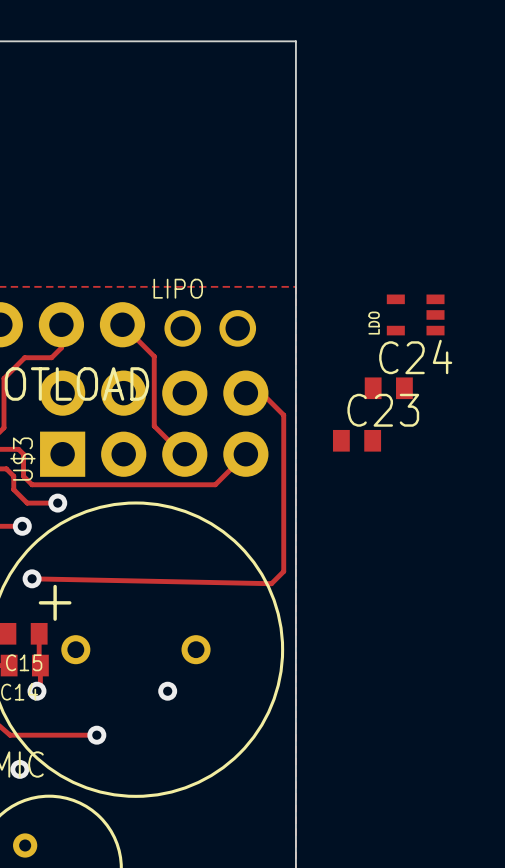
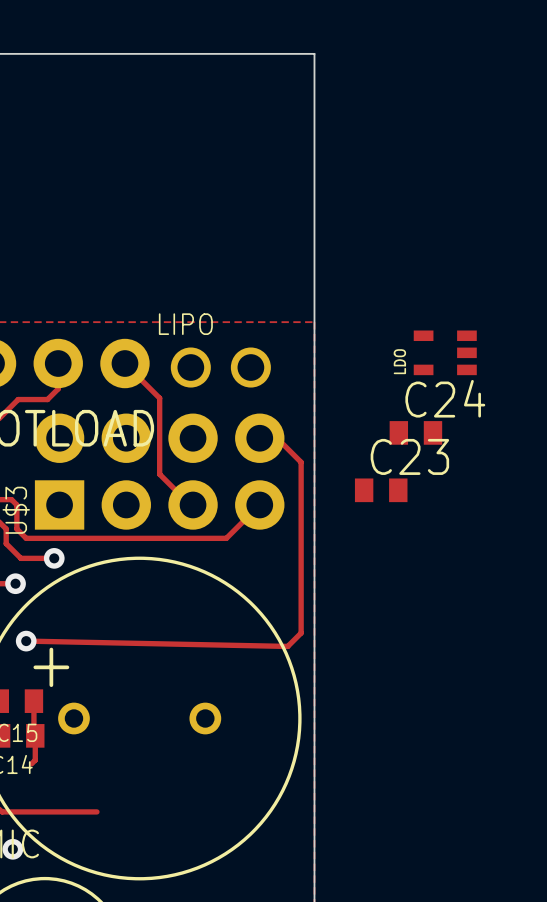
via: (36, 691) -> none
via: (167, 691) -> none
via: (96, 735) -> none

